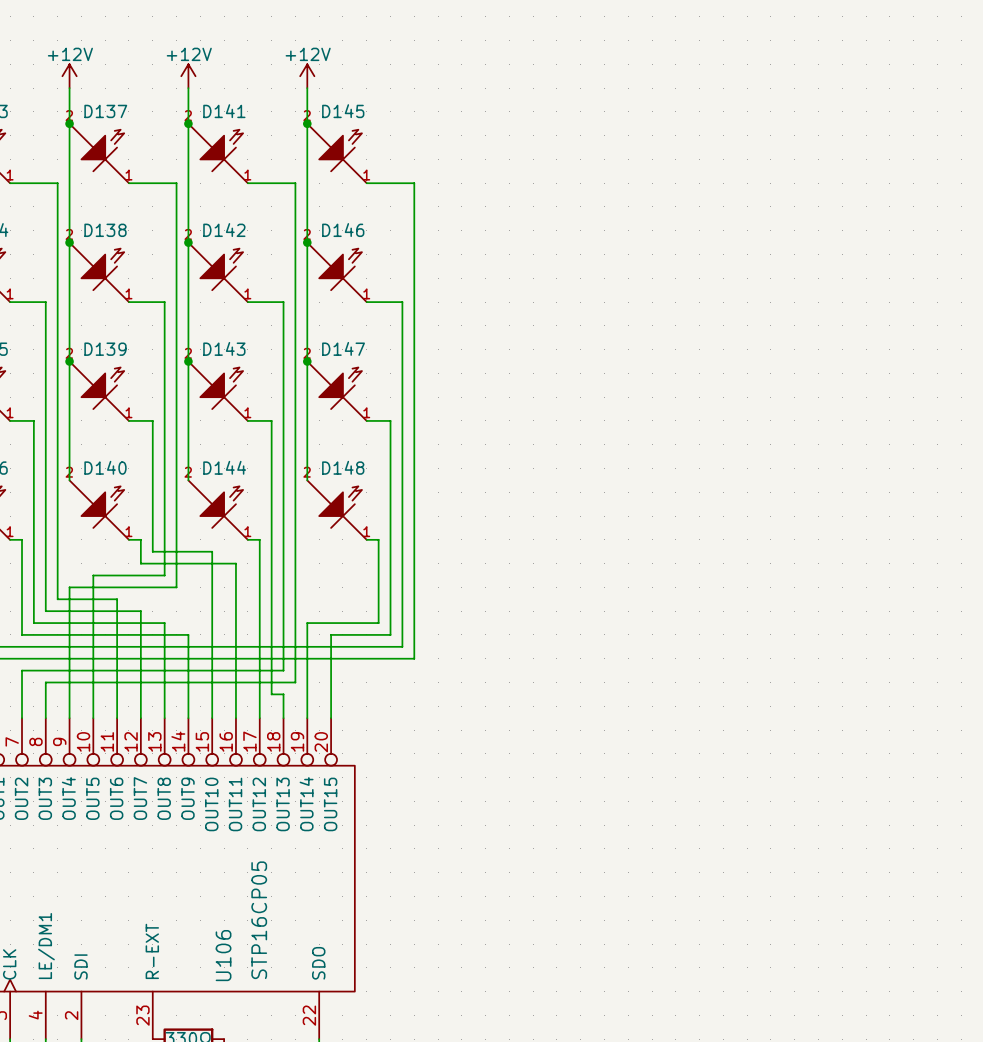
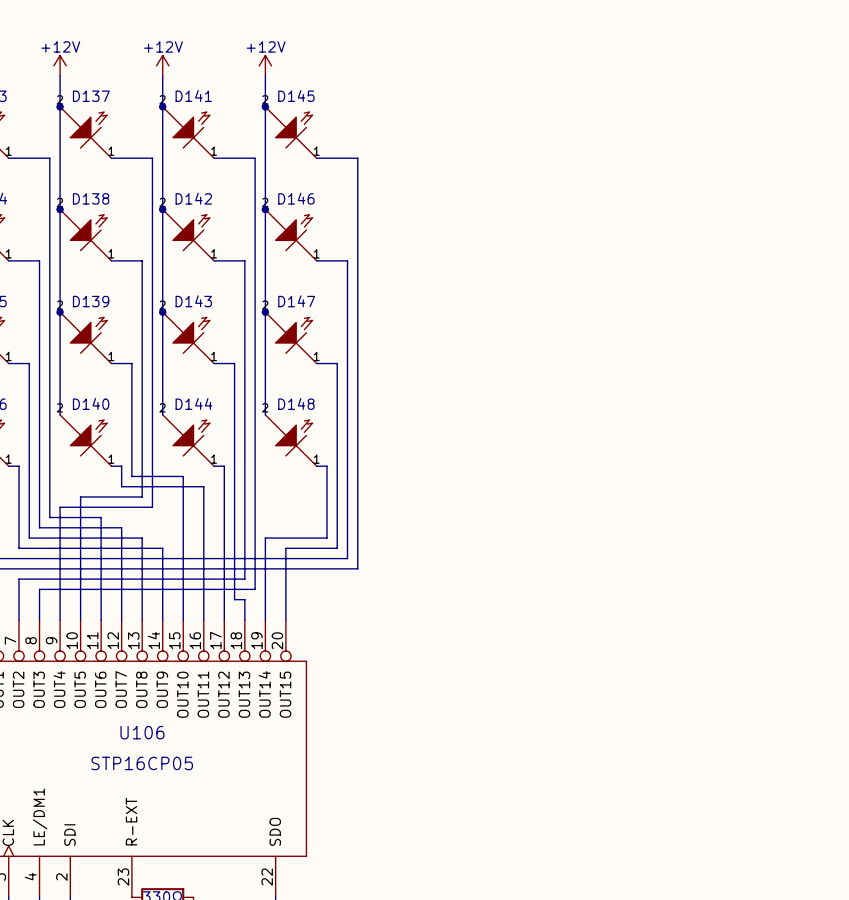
U106 value rotation: 0° (259, 920) -> 90° clockwise (142, 763)
U106 name rotation: 0° (223, 955) -> 90° clockwise (142, 732)
U106 name position: U106 (223, 955) -> U106 (142, 732)

